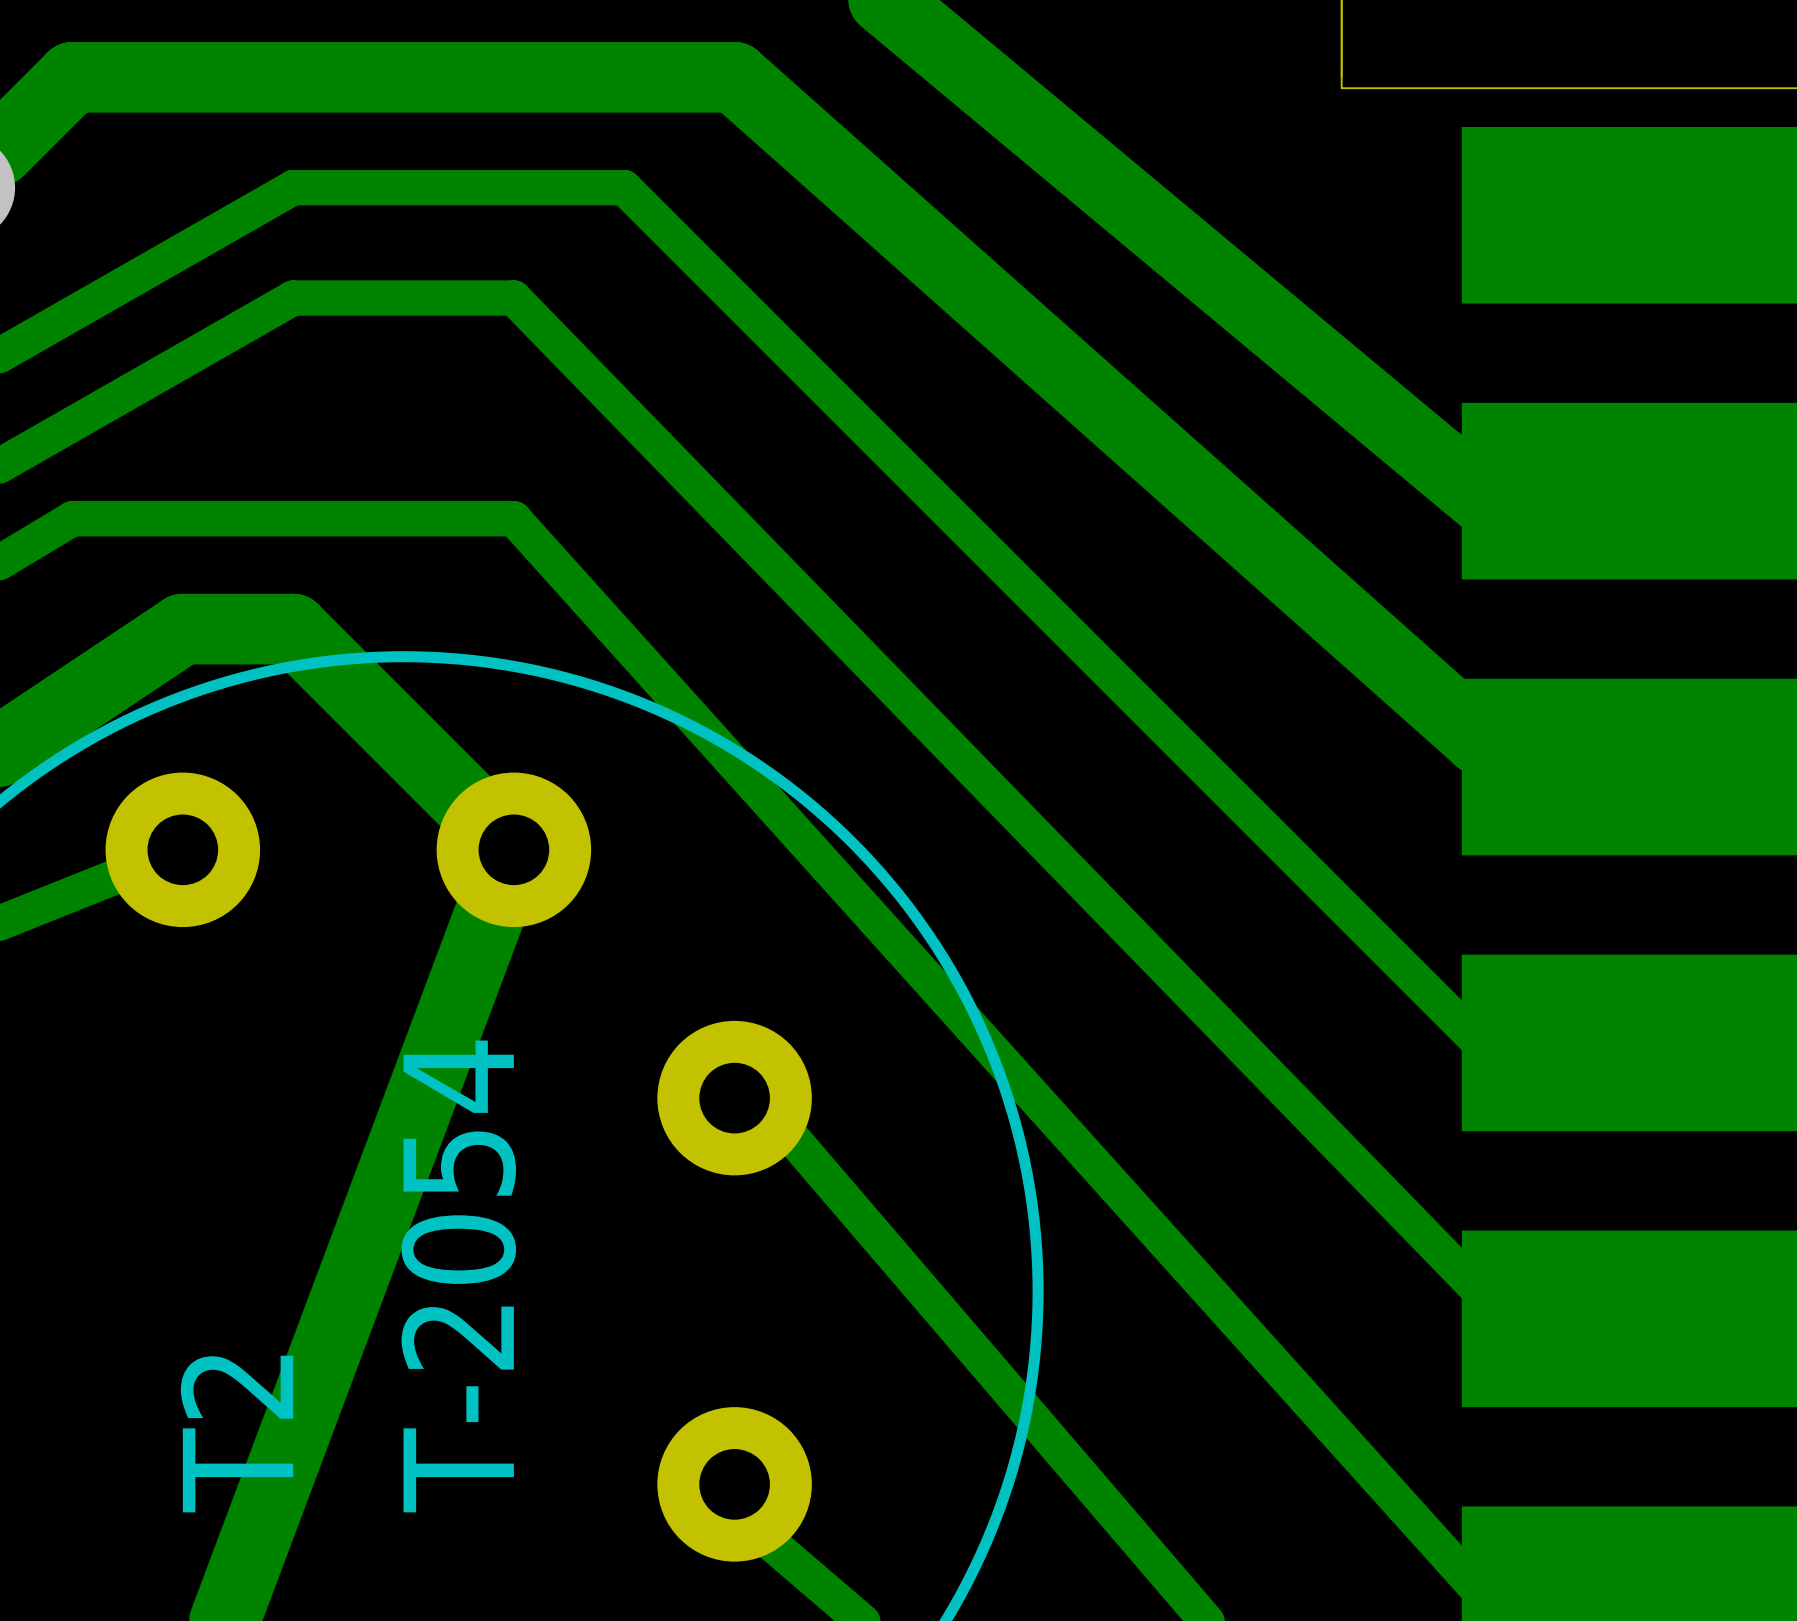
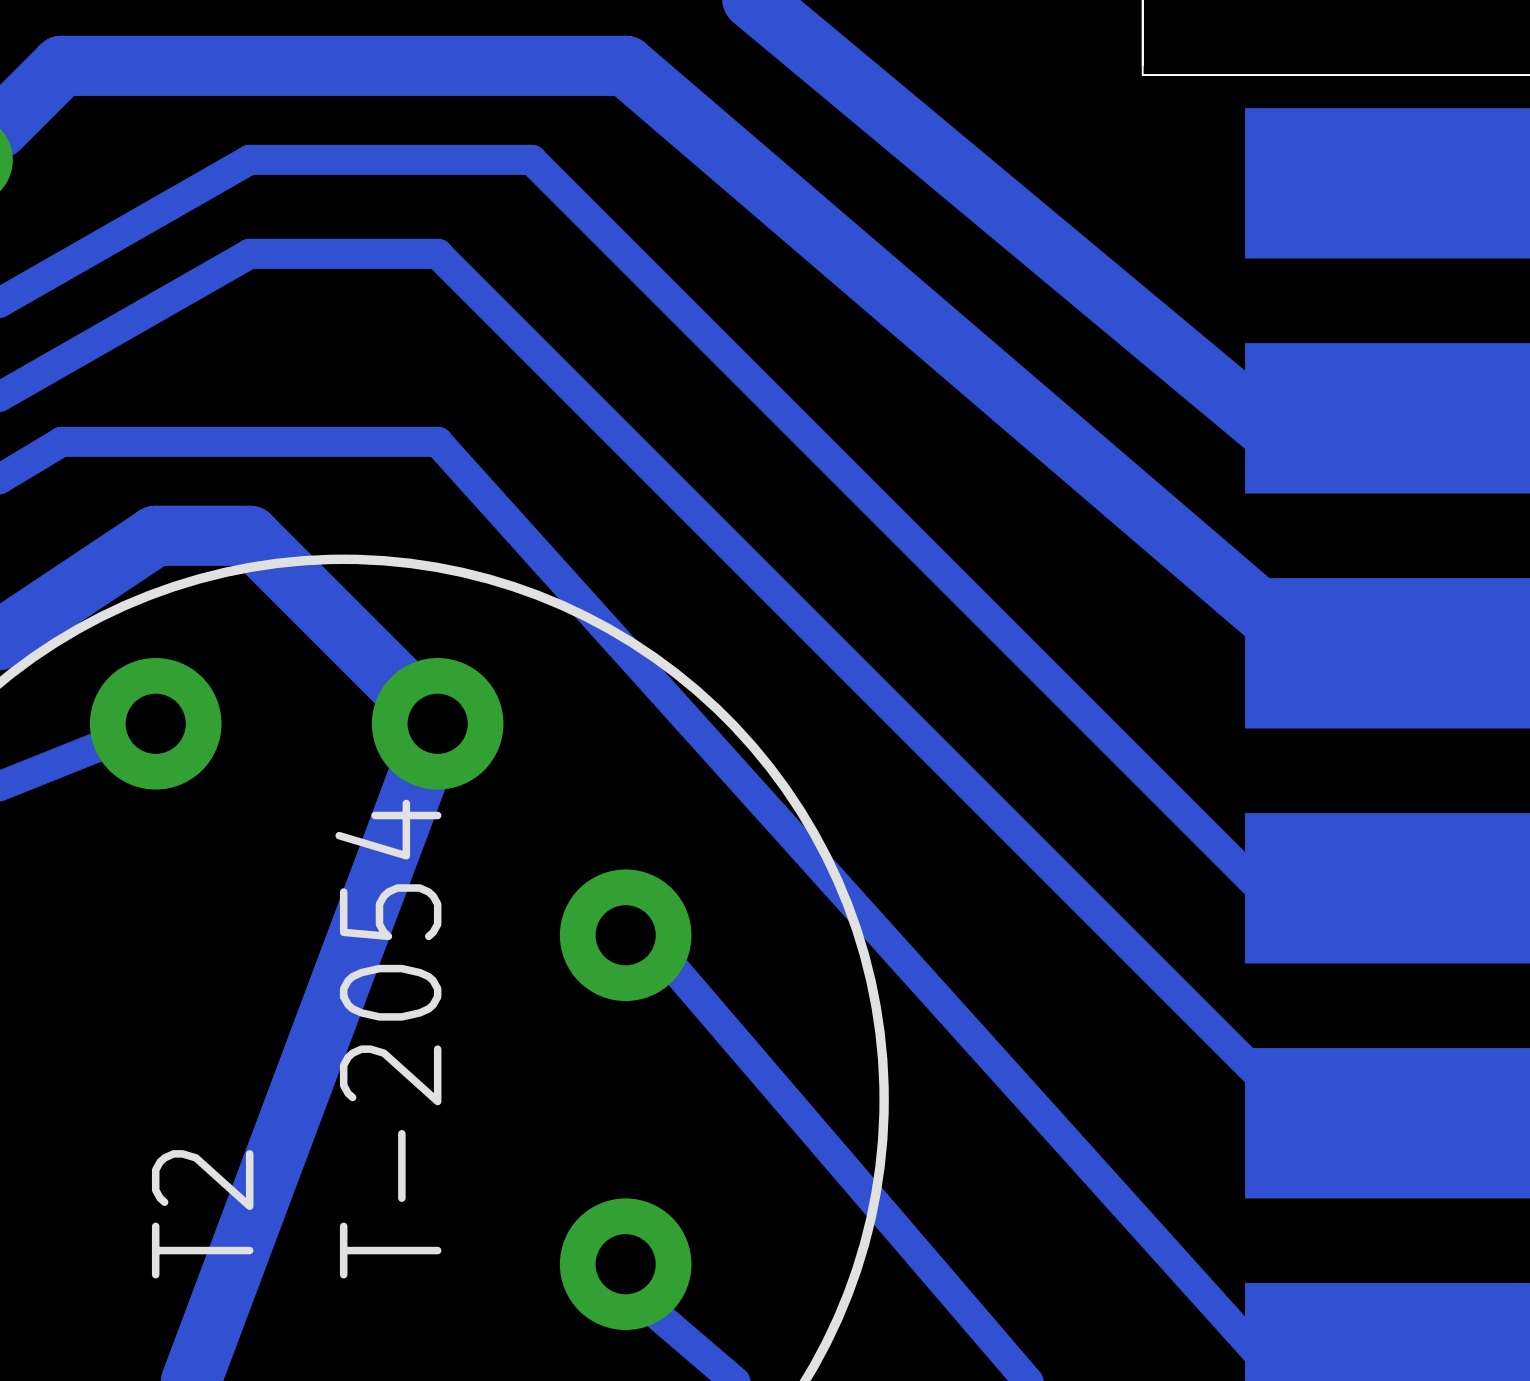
bottom track: (734, 77) (1479, 739) (1507, 739) -> (625, 65) (1283, 629)
bottom track: (513, 298) (1479, 1291) (1507, 1291) -> (437, 253) (1283, 1099)

